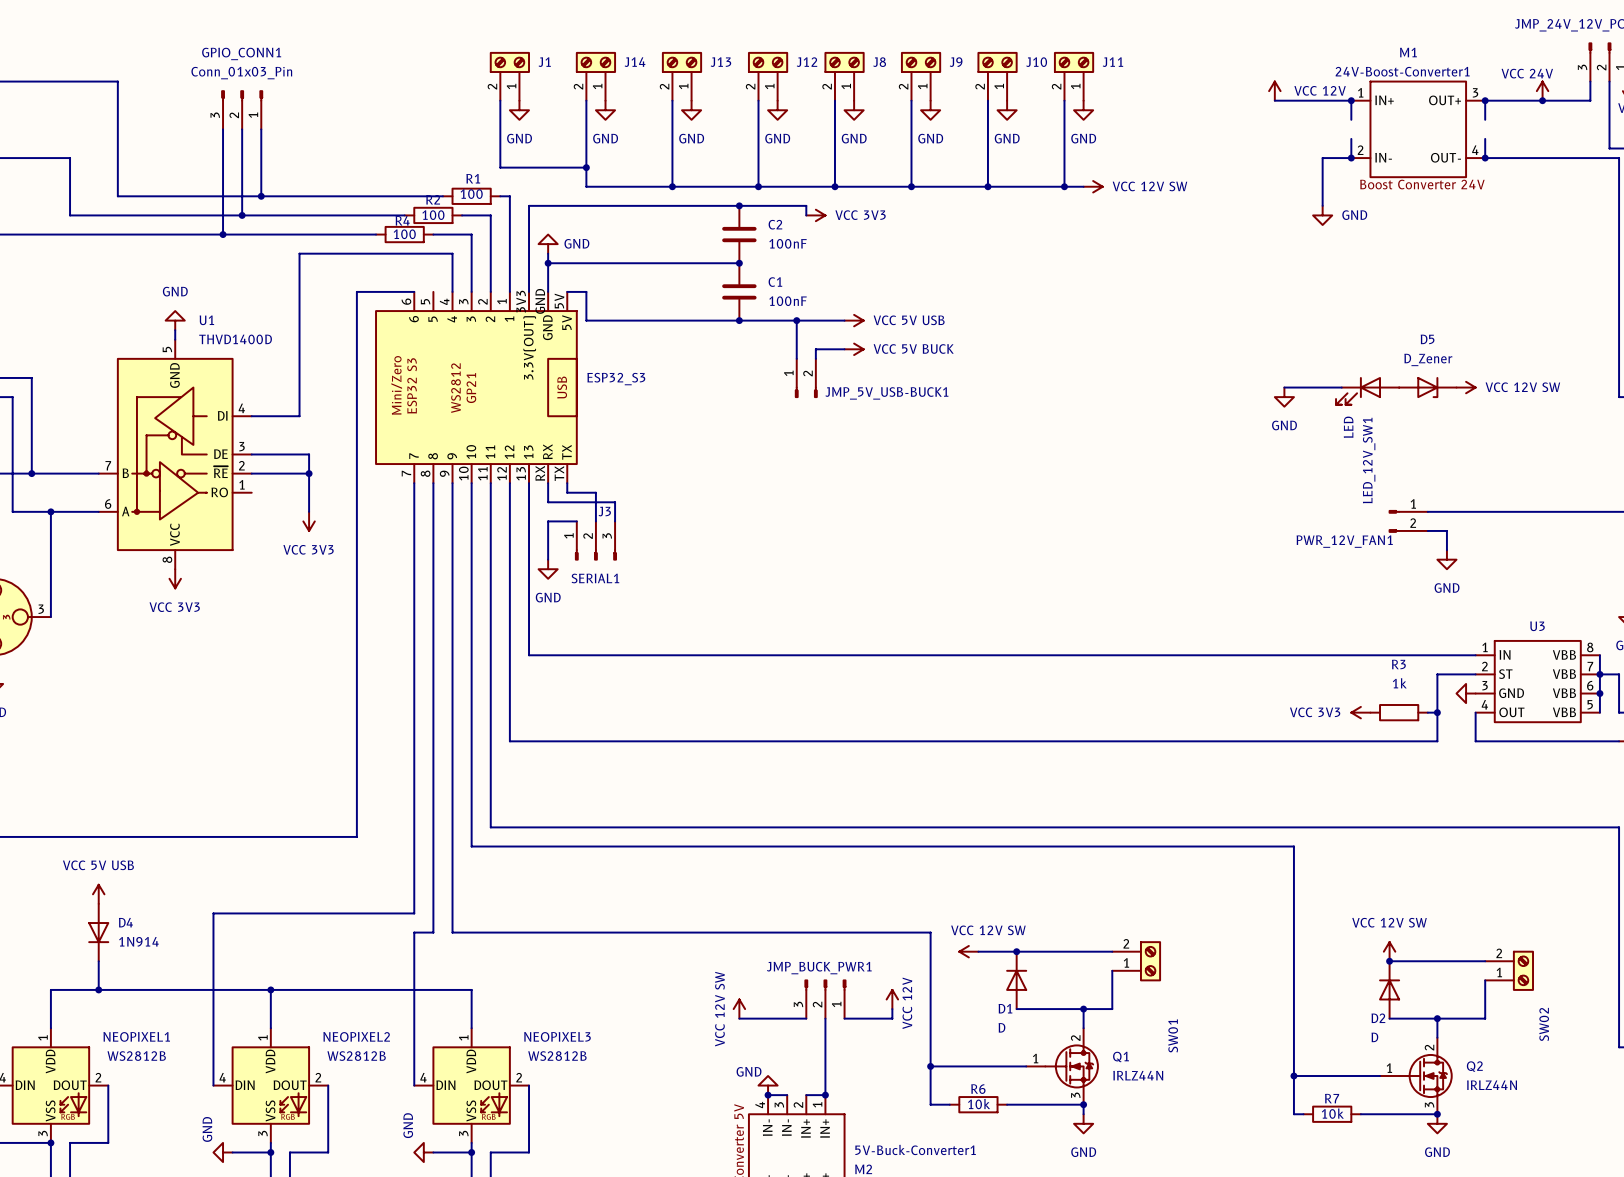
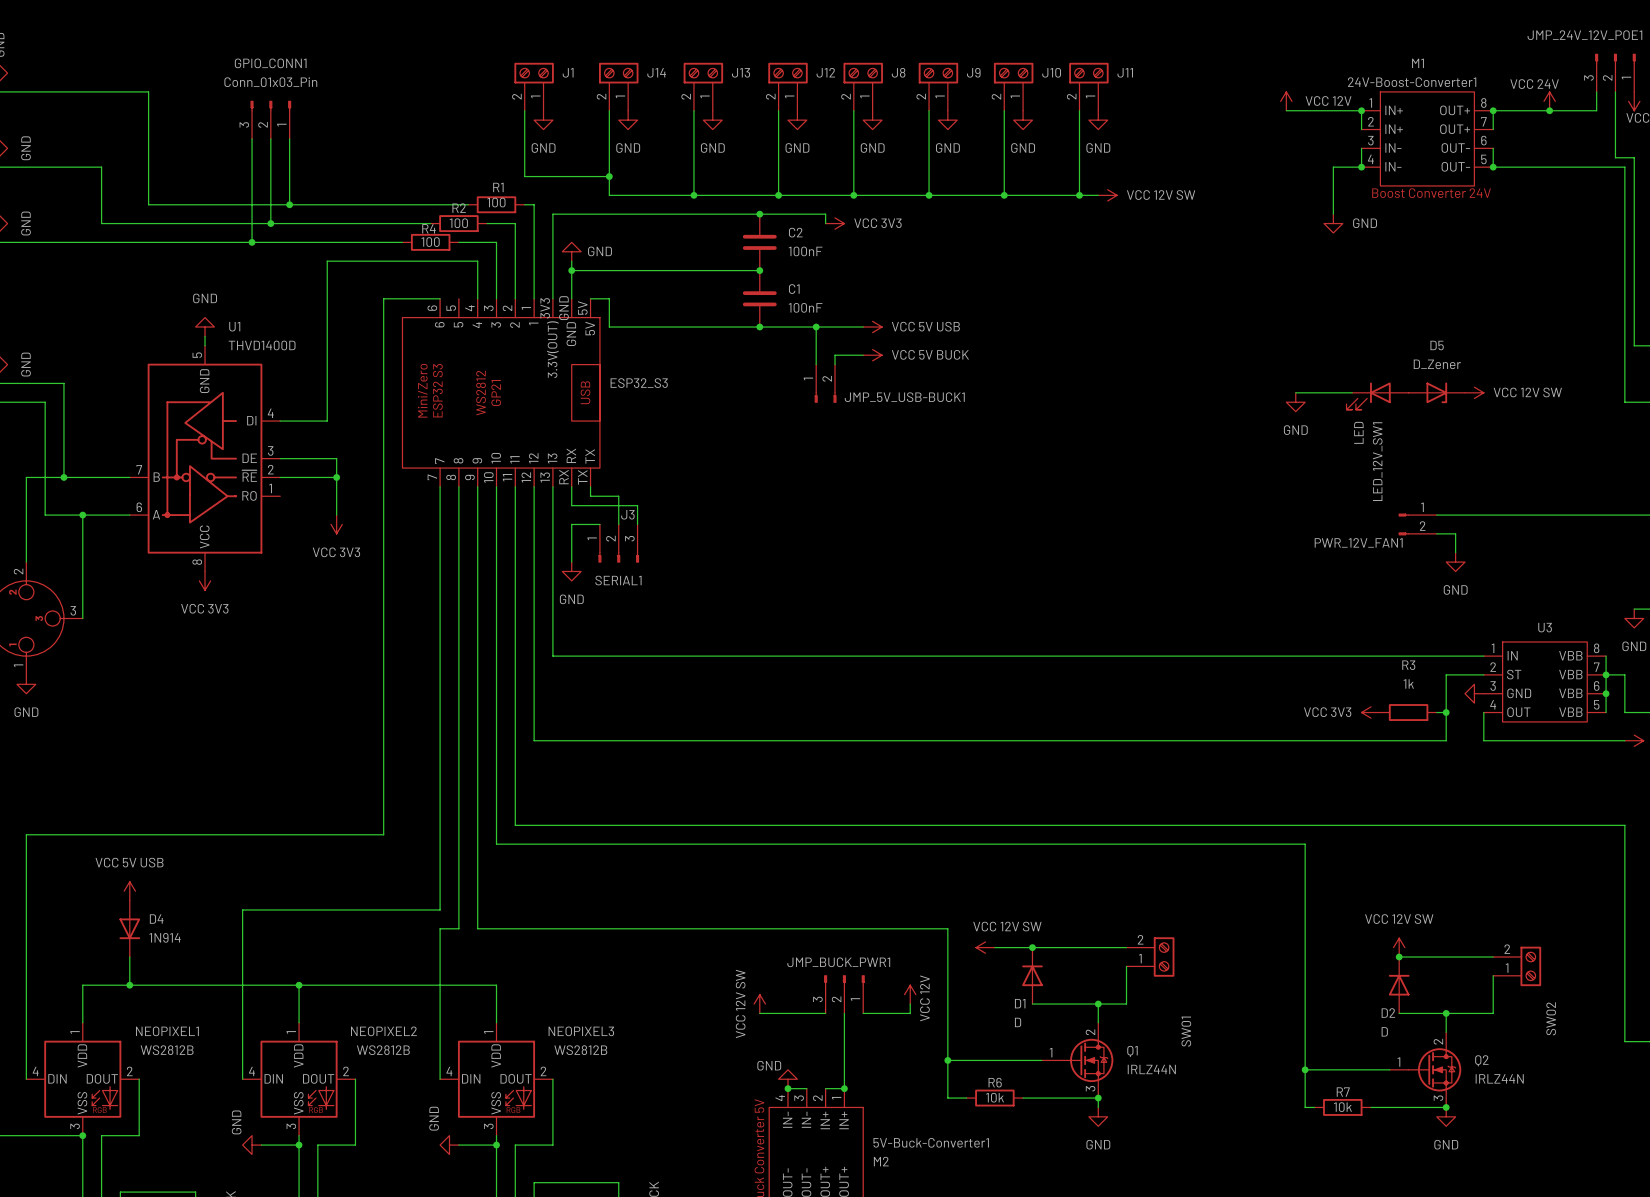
24V-Boost-Converter1 symbol: [1351, 81, 1486, 178] -> [1361, 91, 1494, 186]

